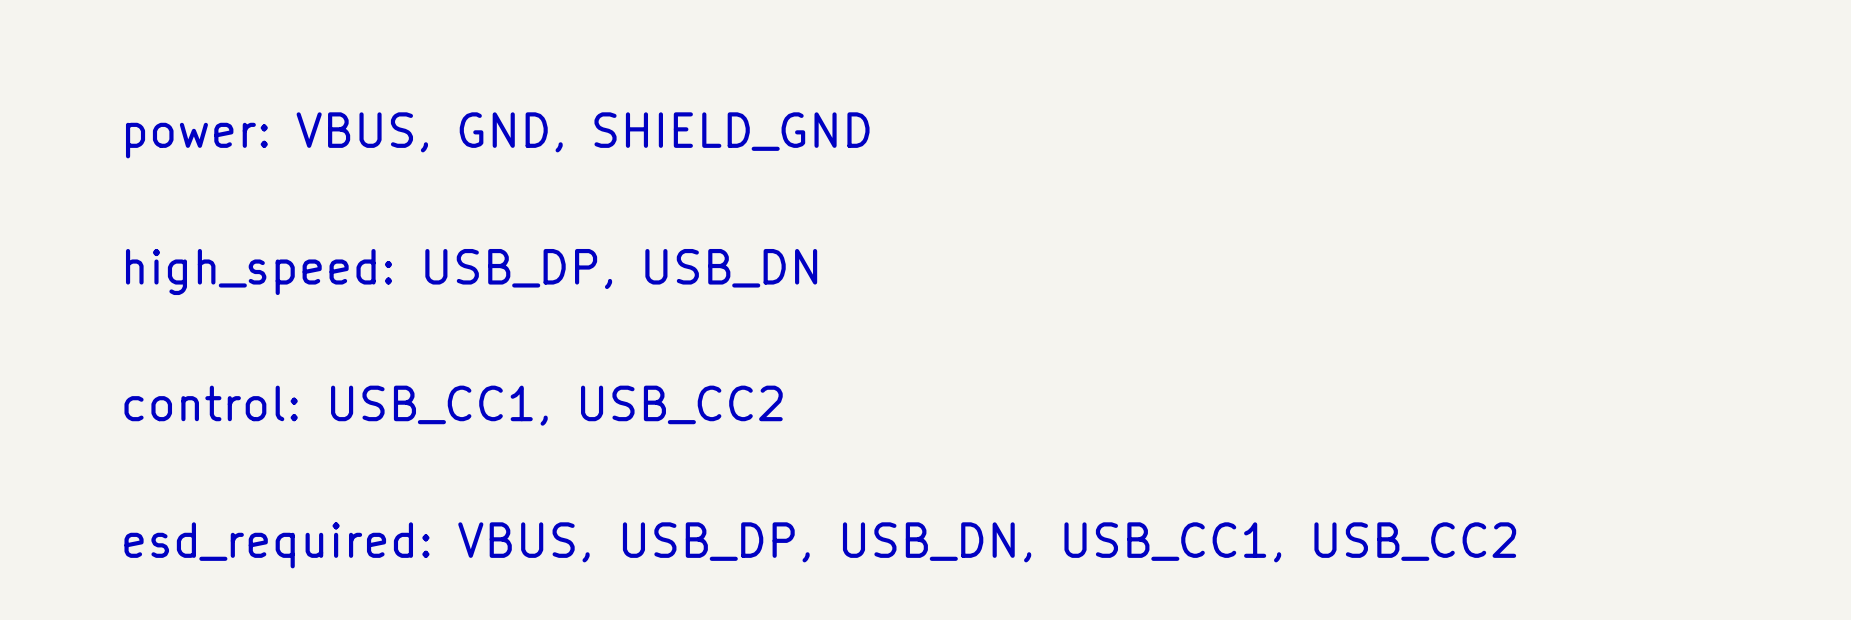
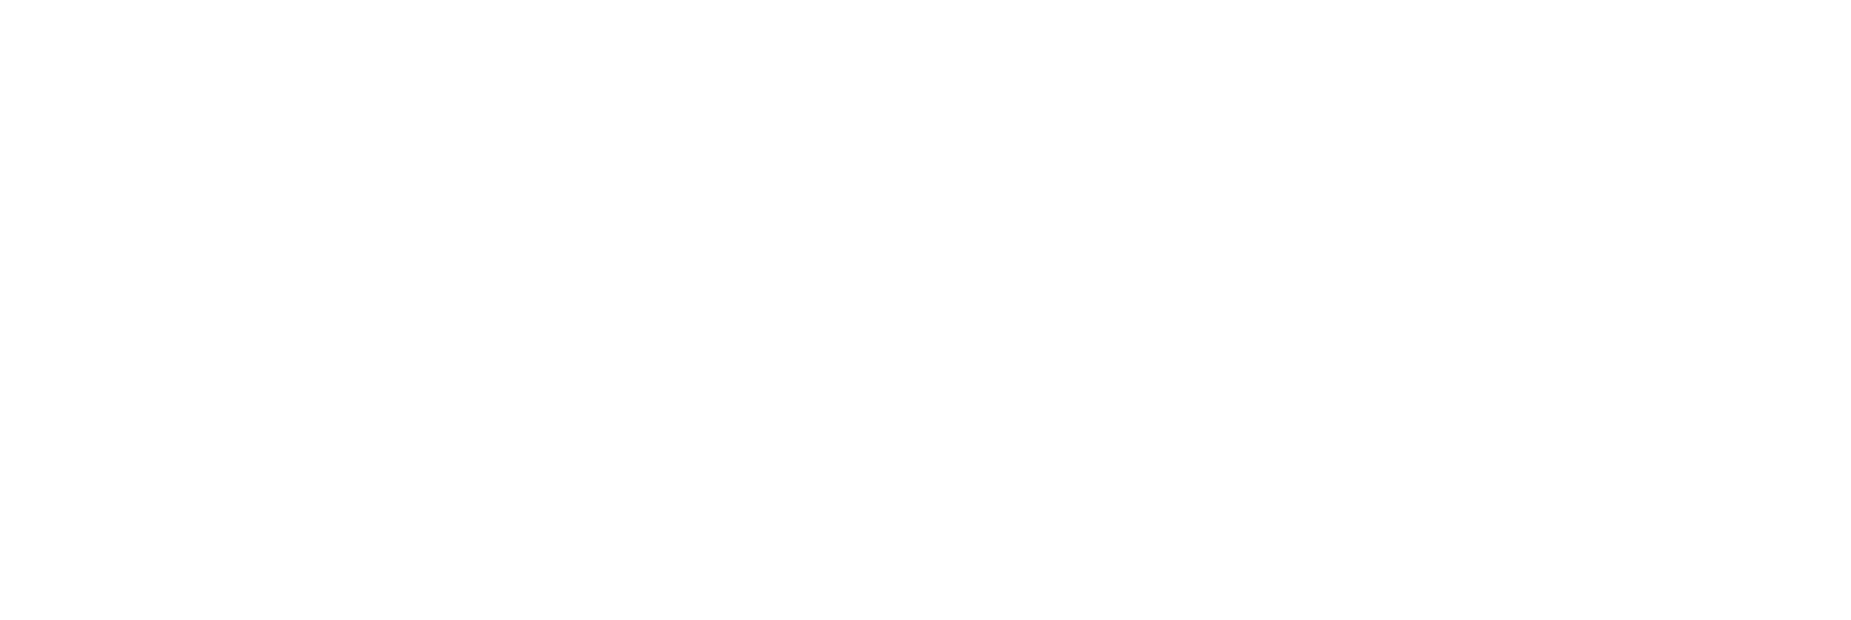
text: power: VBUS, GND, SHIELD_GND (497, 135) -> none
text: high_speed: USB_DP, USB_DN (471, 272) -> none
text: control: USB_CC1, USB_CC2 (453, 405) -> none
text: esd_required: VBUS, USB_DP, USB_DN, USB_CC1, USB_CC2 (820, 545) -> none

